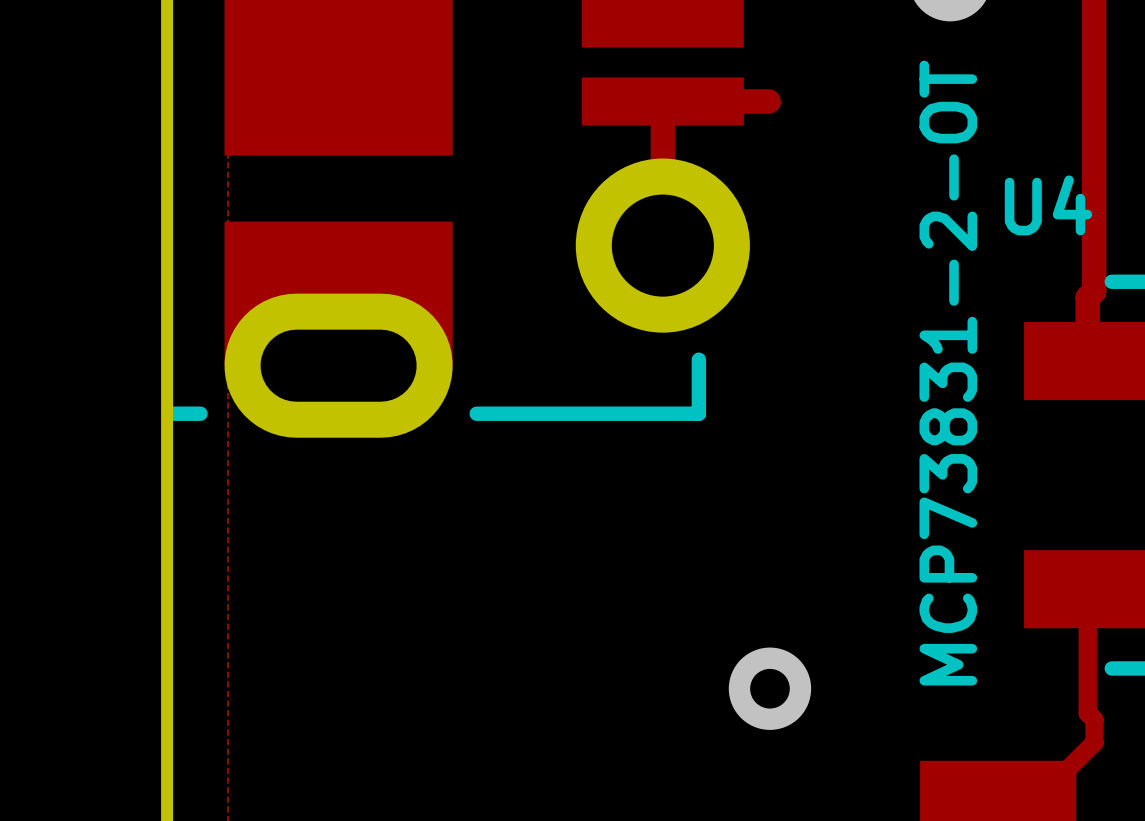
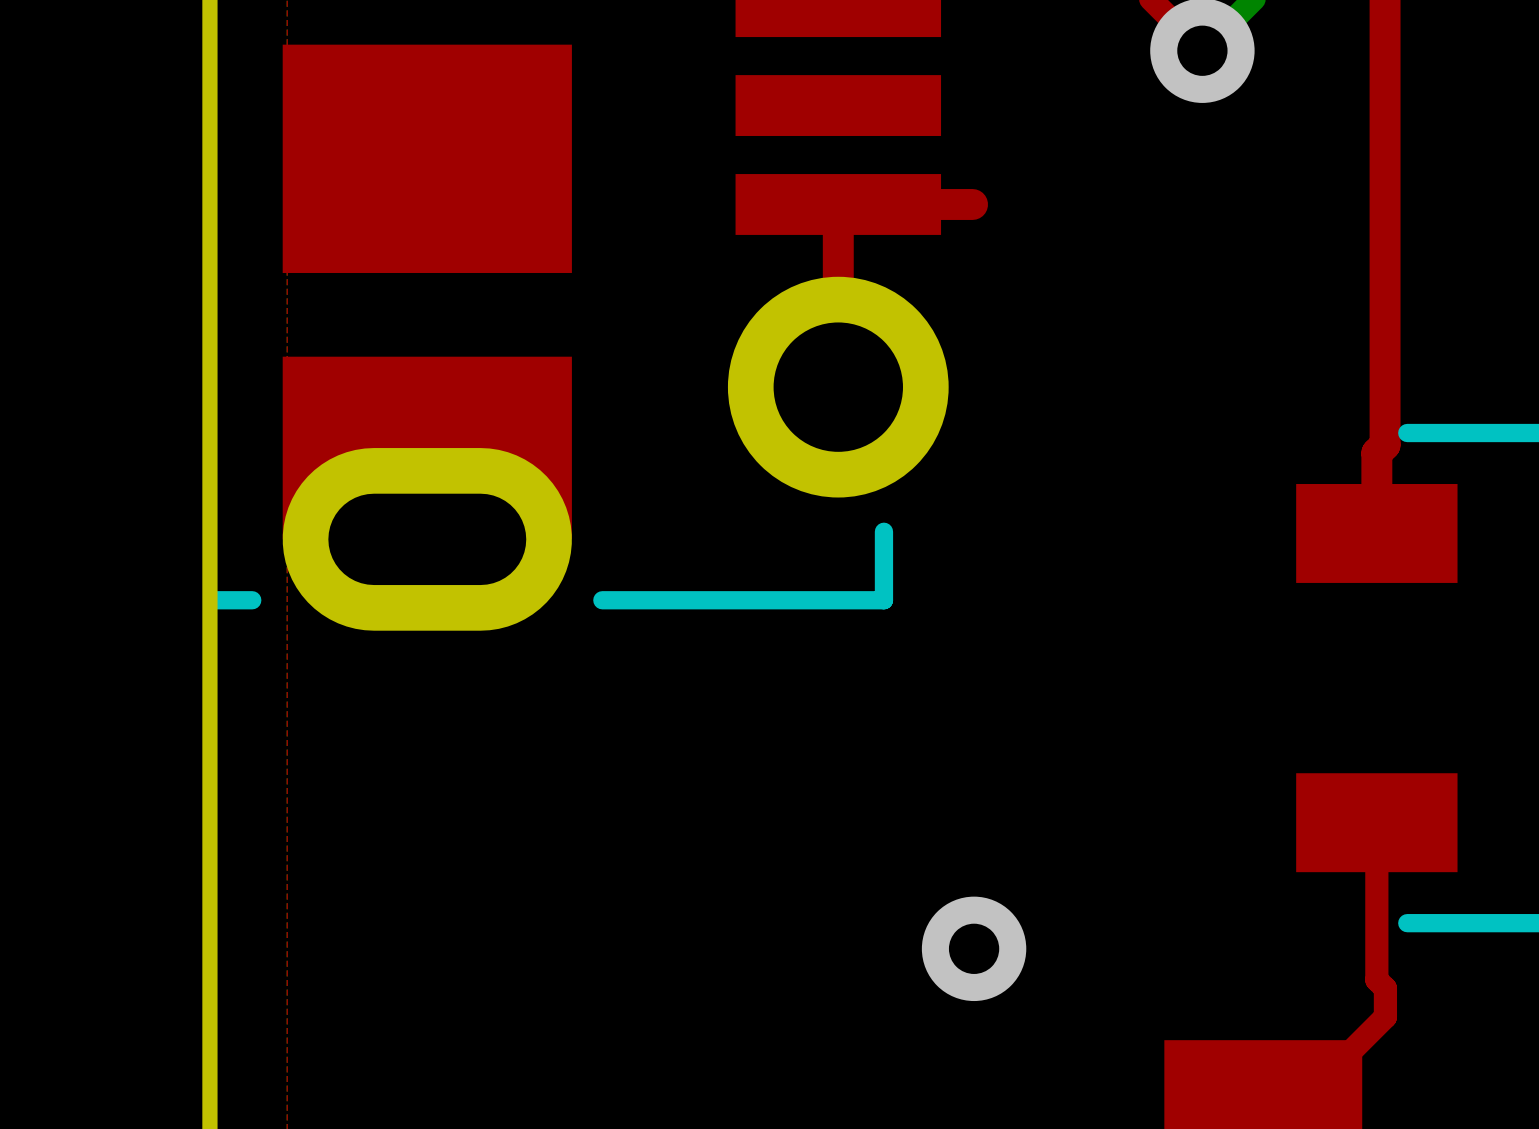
U4 name: U4 (1048, 205) -> none
U4 value: MCP73831-2-OT (948, 373) -> none

